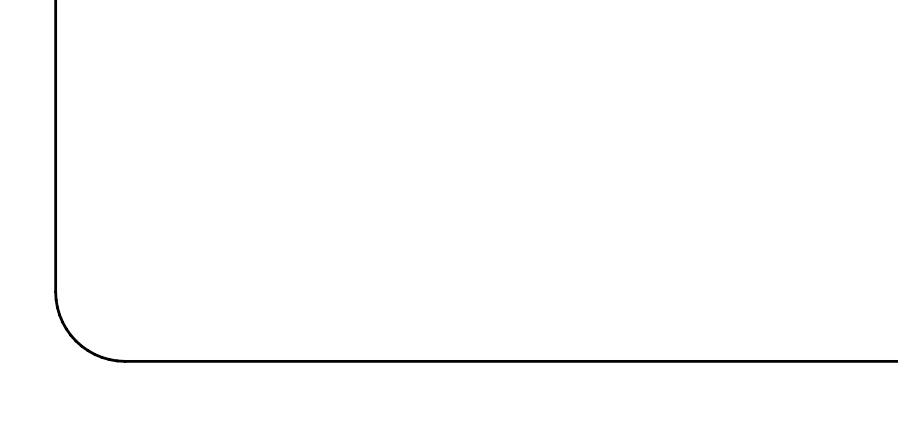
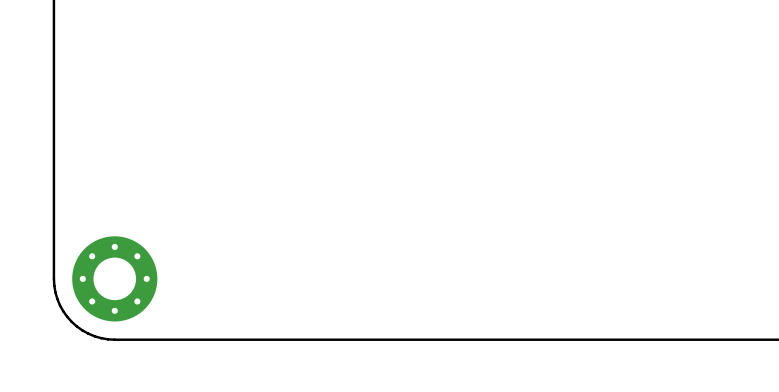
part: none -> (114, 278)

